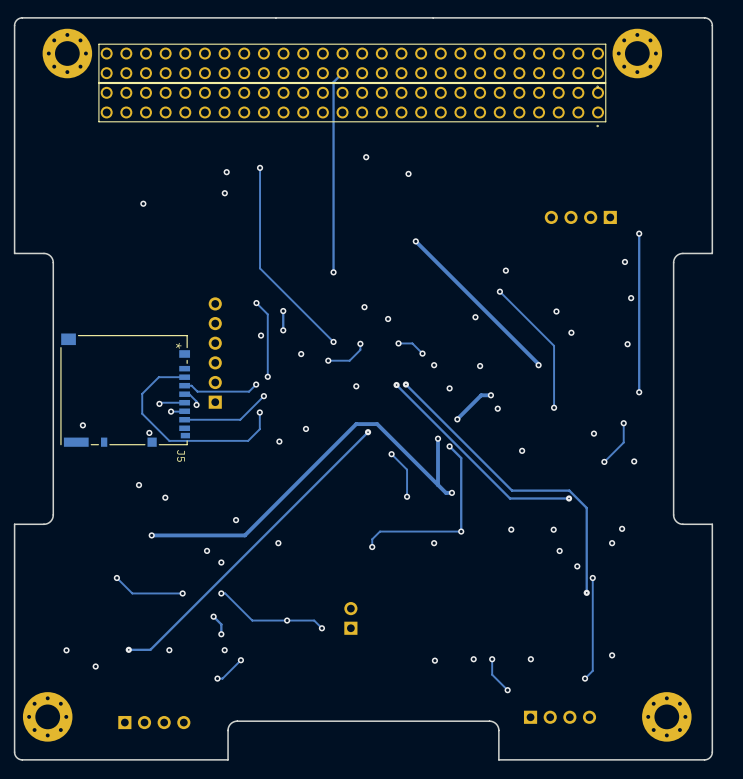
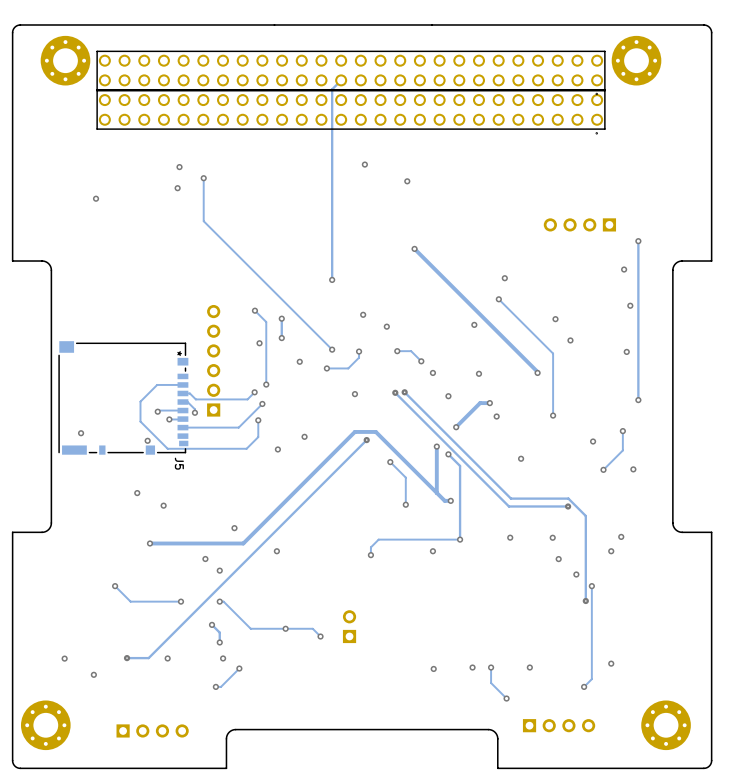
via: none -> (179, 167)
track: (260, 167) (260, 268) -> (203, 178) (203, 221) (258, 276)
via: (260, 167) -> none
via: none -> (203, 178)
via: (226, 172) -> none
via: none -> (177, 188)
via: none -> (96, 198)
via: (224, 193) -> none
via: (143, 203) -> none

